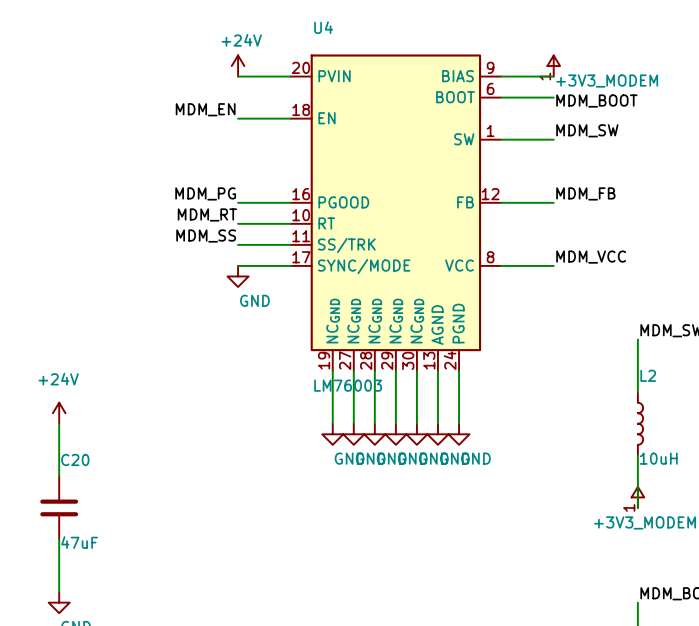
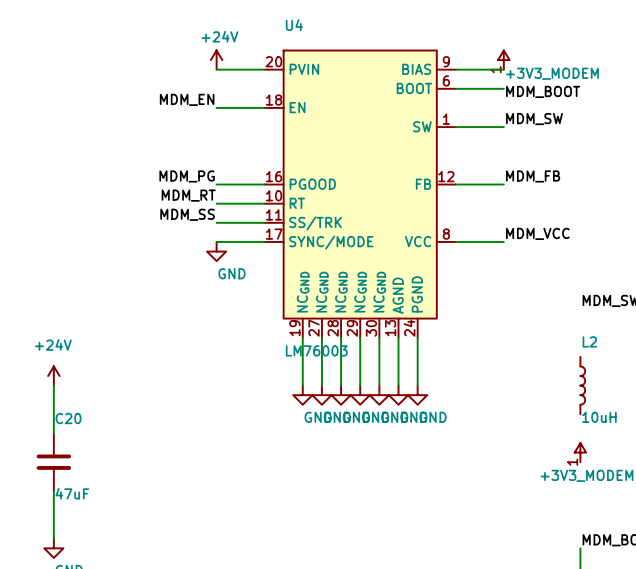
wire: (637, 339) (637, 392) -> none
wire: (637, 455) (637, 507) -> none

